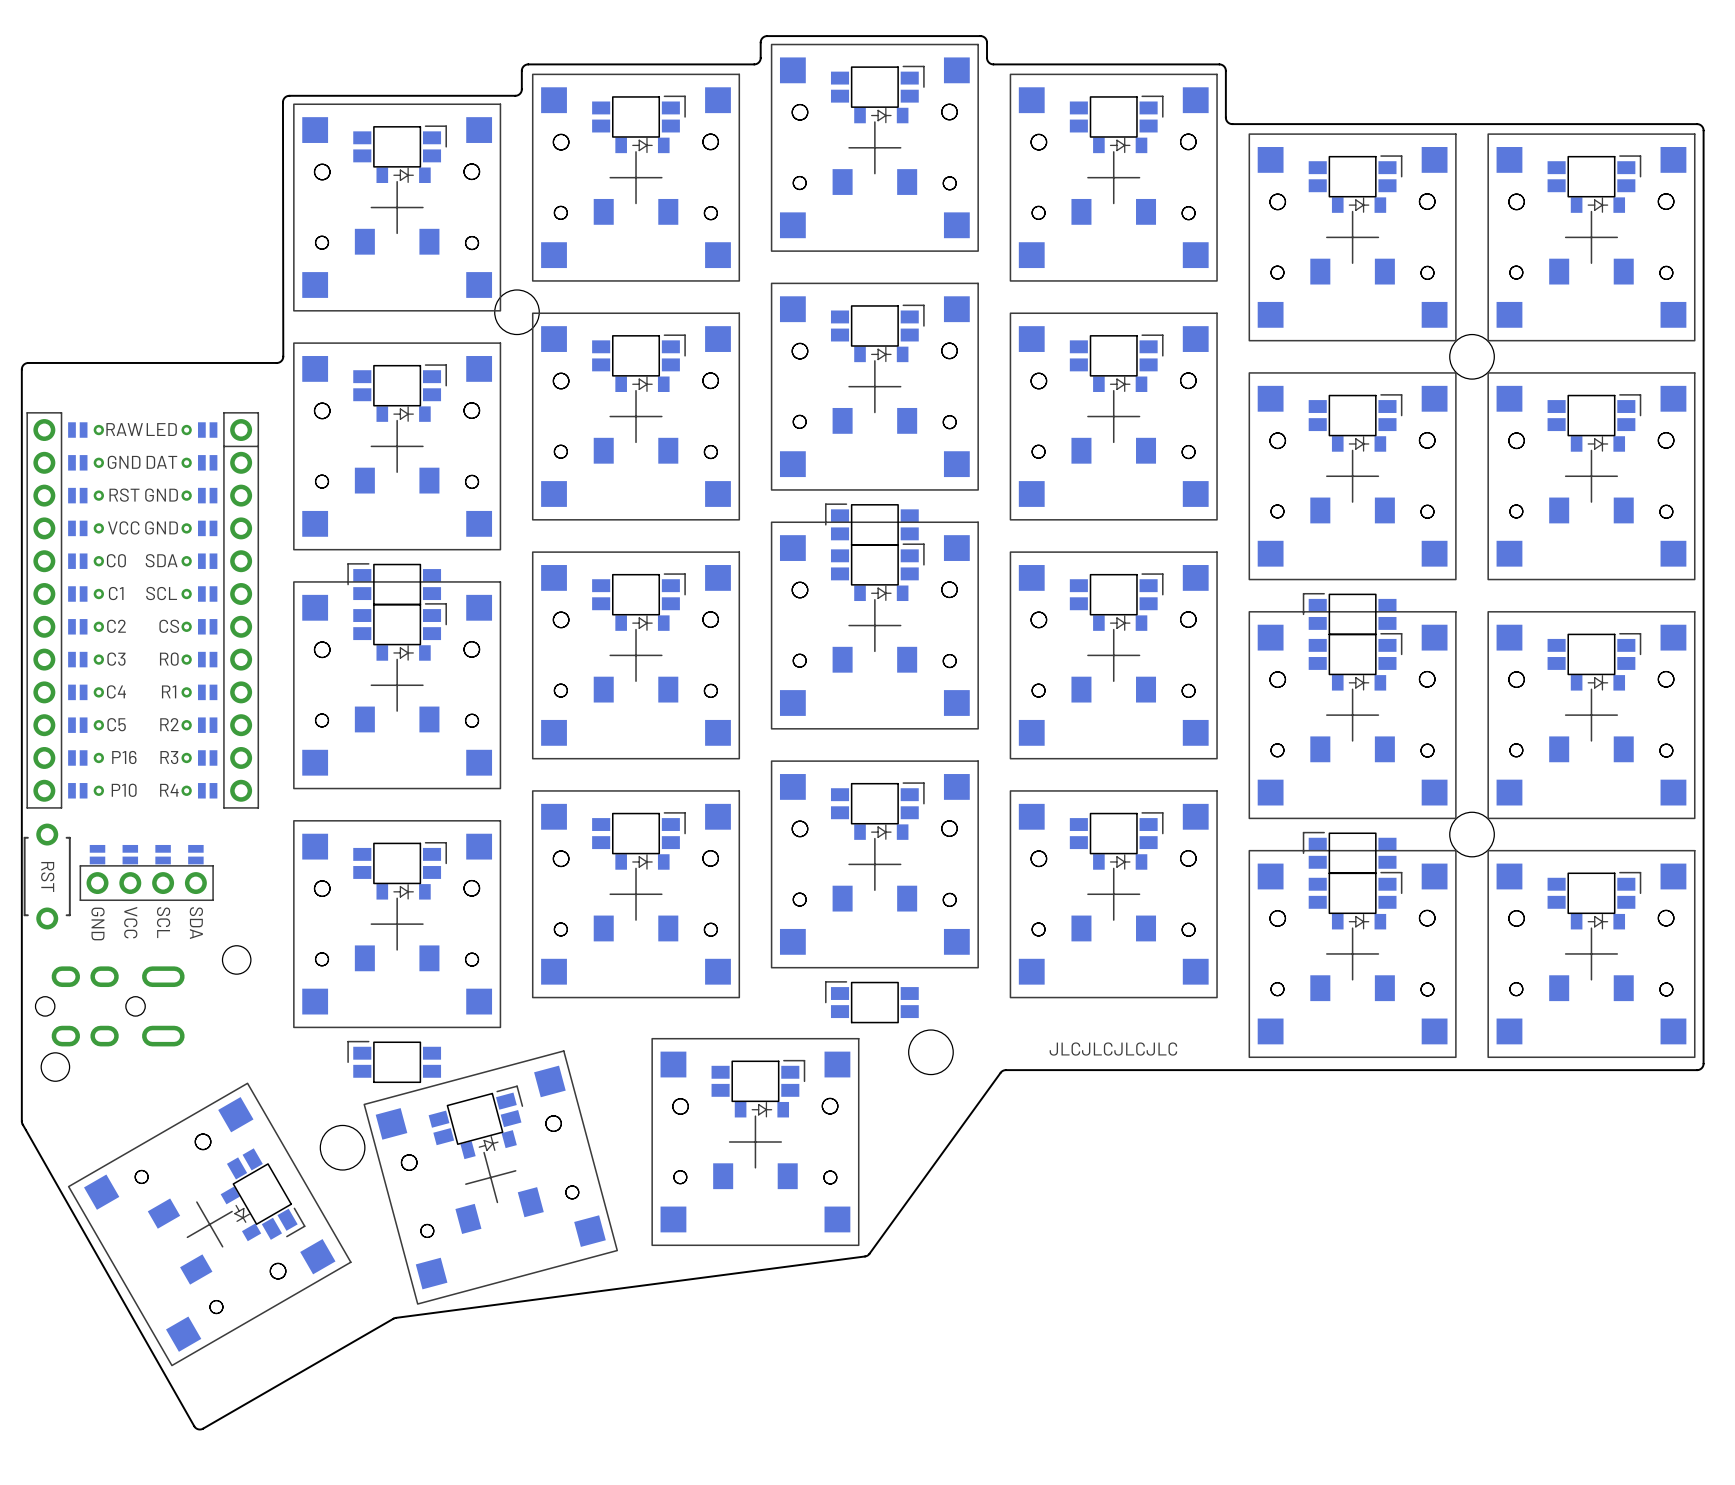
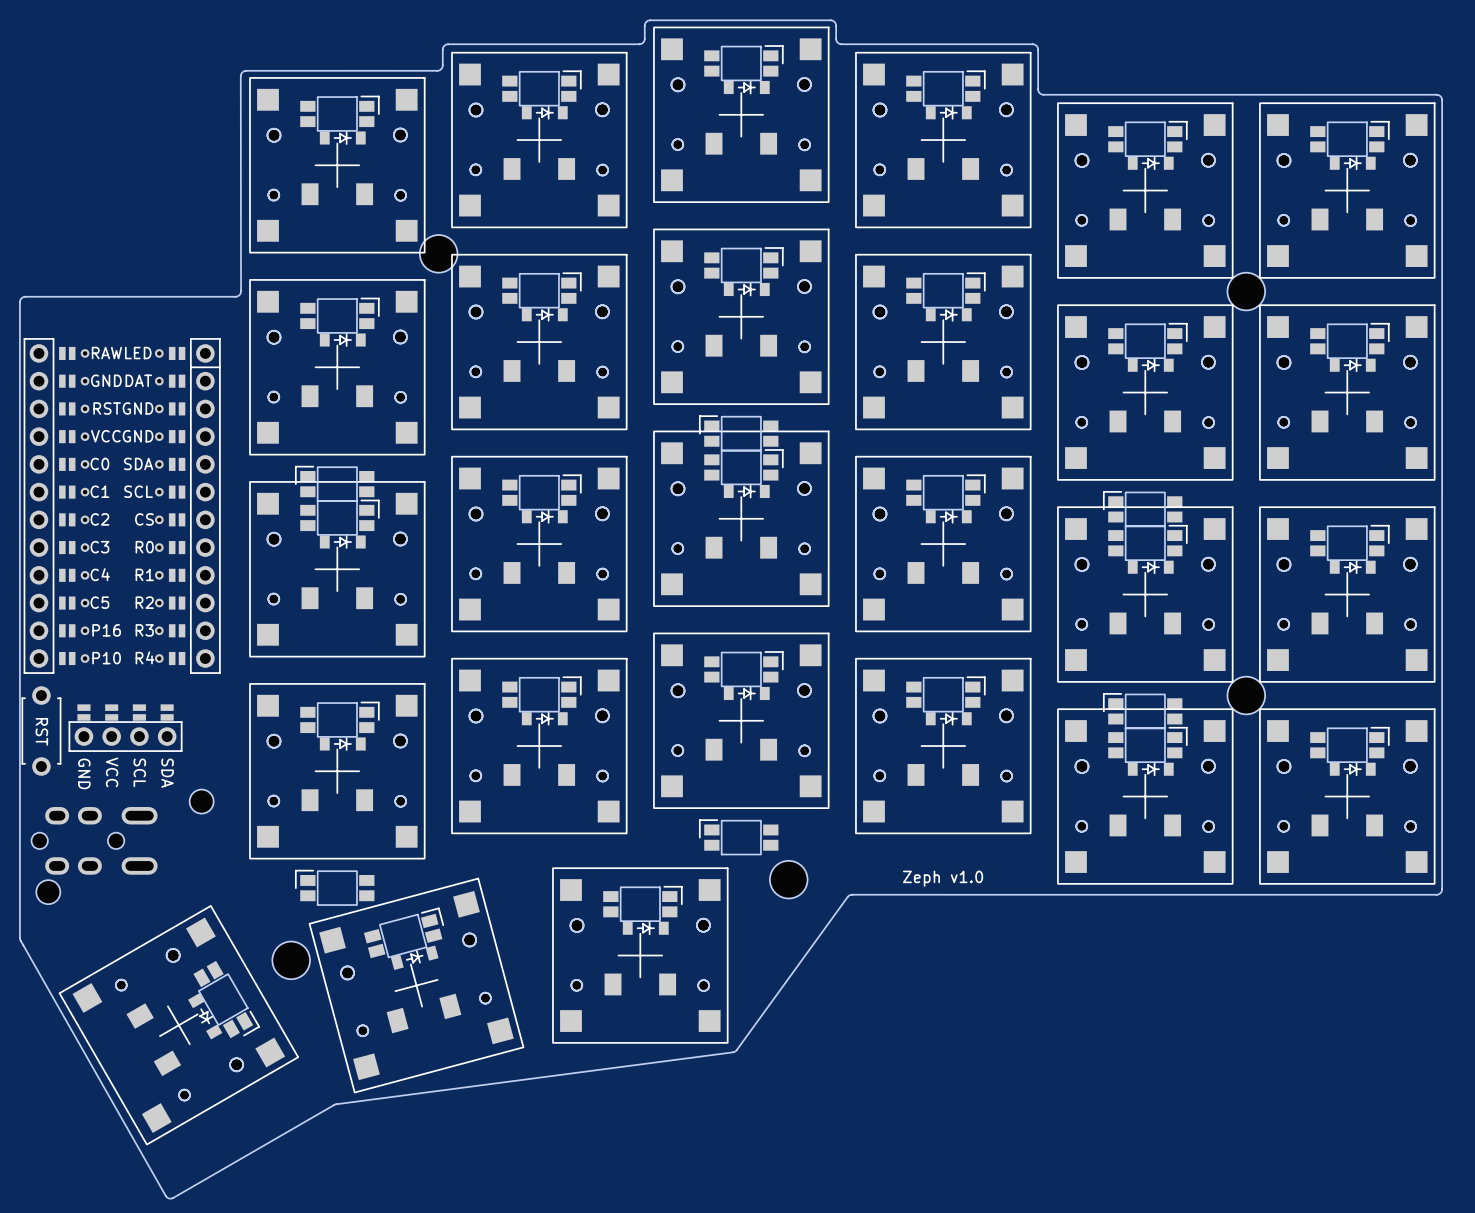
text: JLCJLCJLCJLC (1113, 1049) -> Zeph v1.0 (943, 878)

